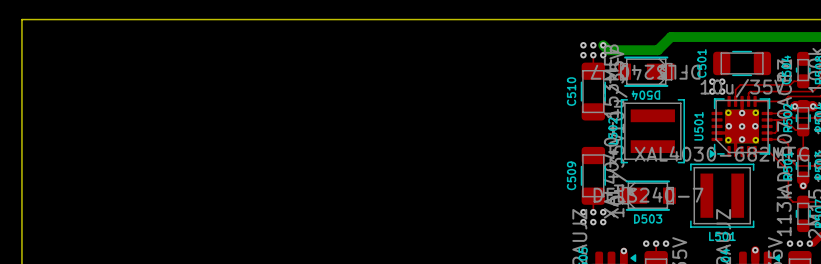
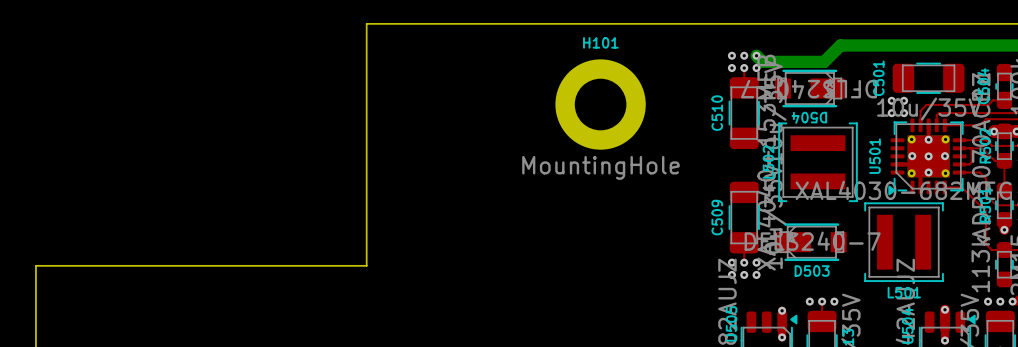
board edge: (288, 19) (21, 19) (21, 214) -> (366, 23) (366, 265) (35, 265)
H101: none -> MountingHole (600, 104)

